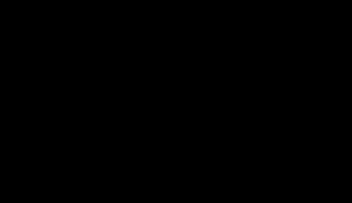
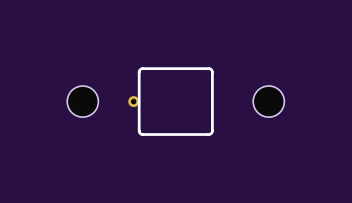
part: none -> (175, 101)

